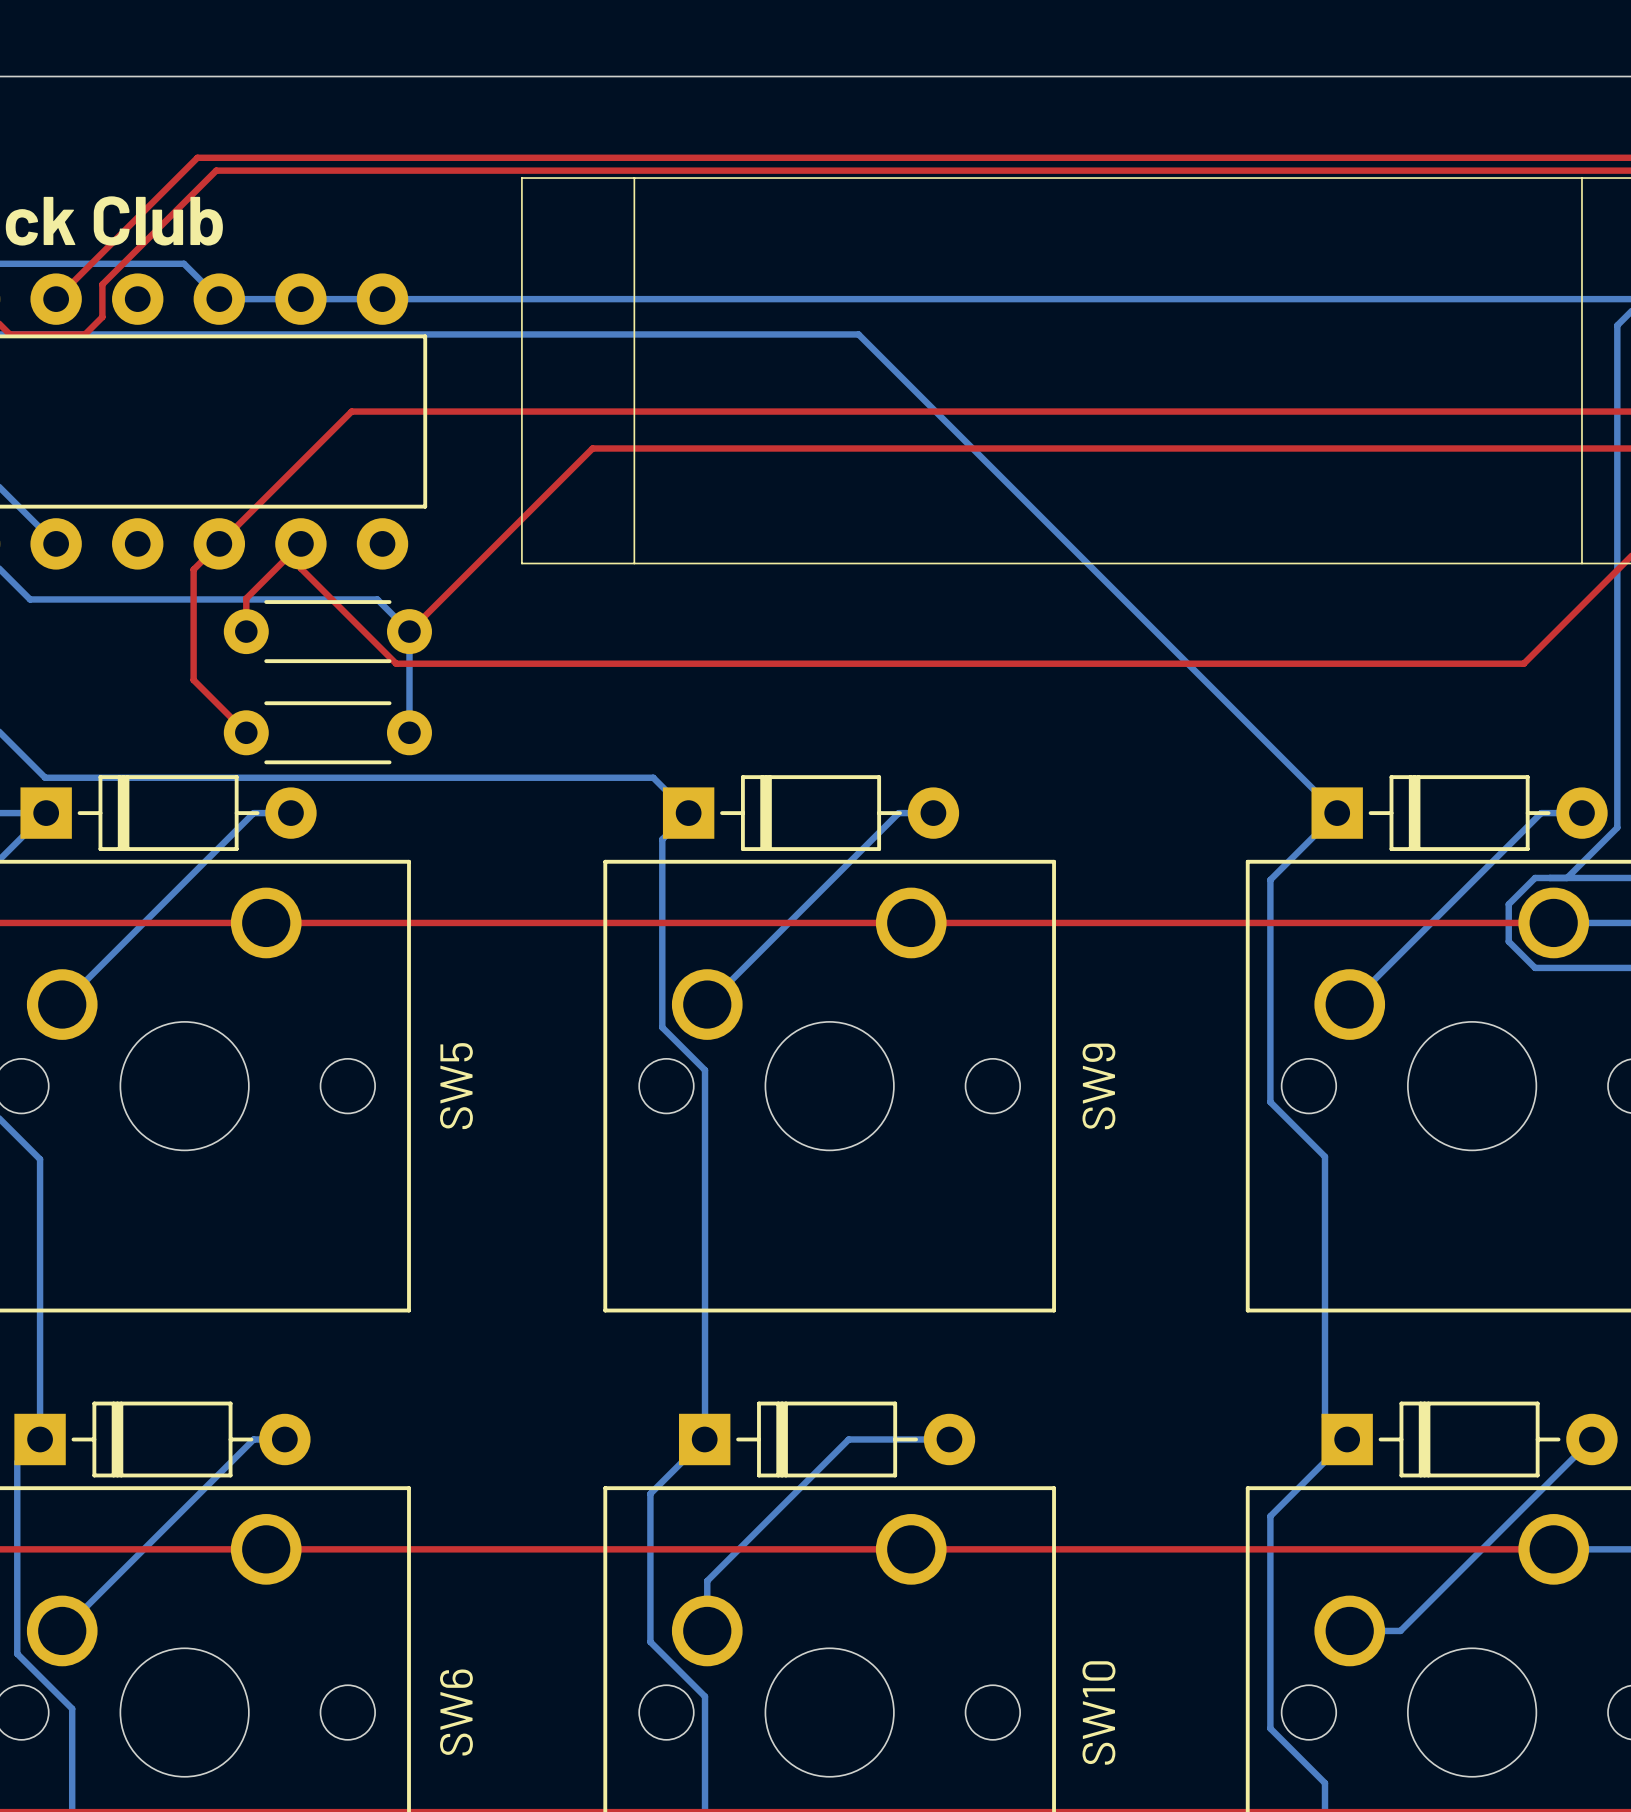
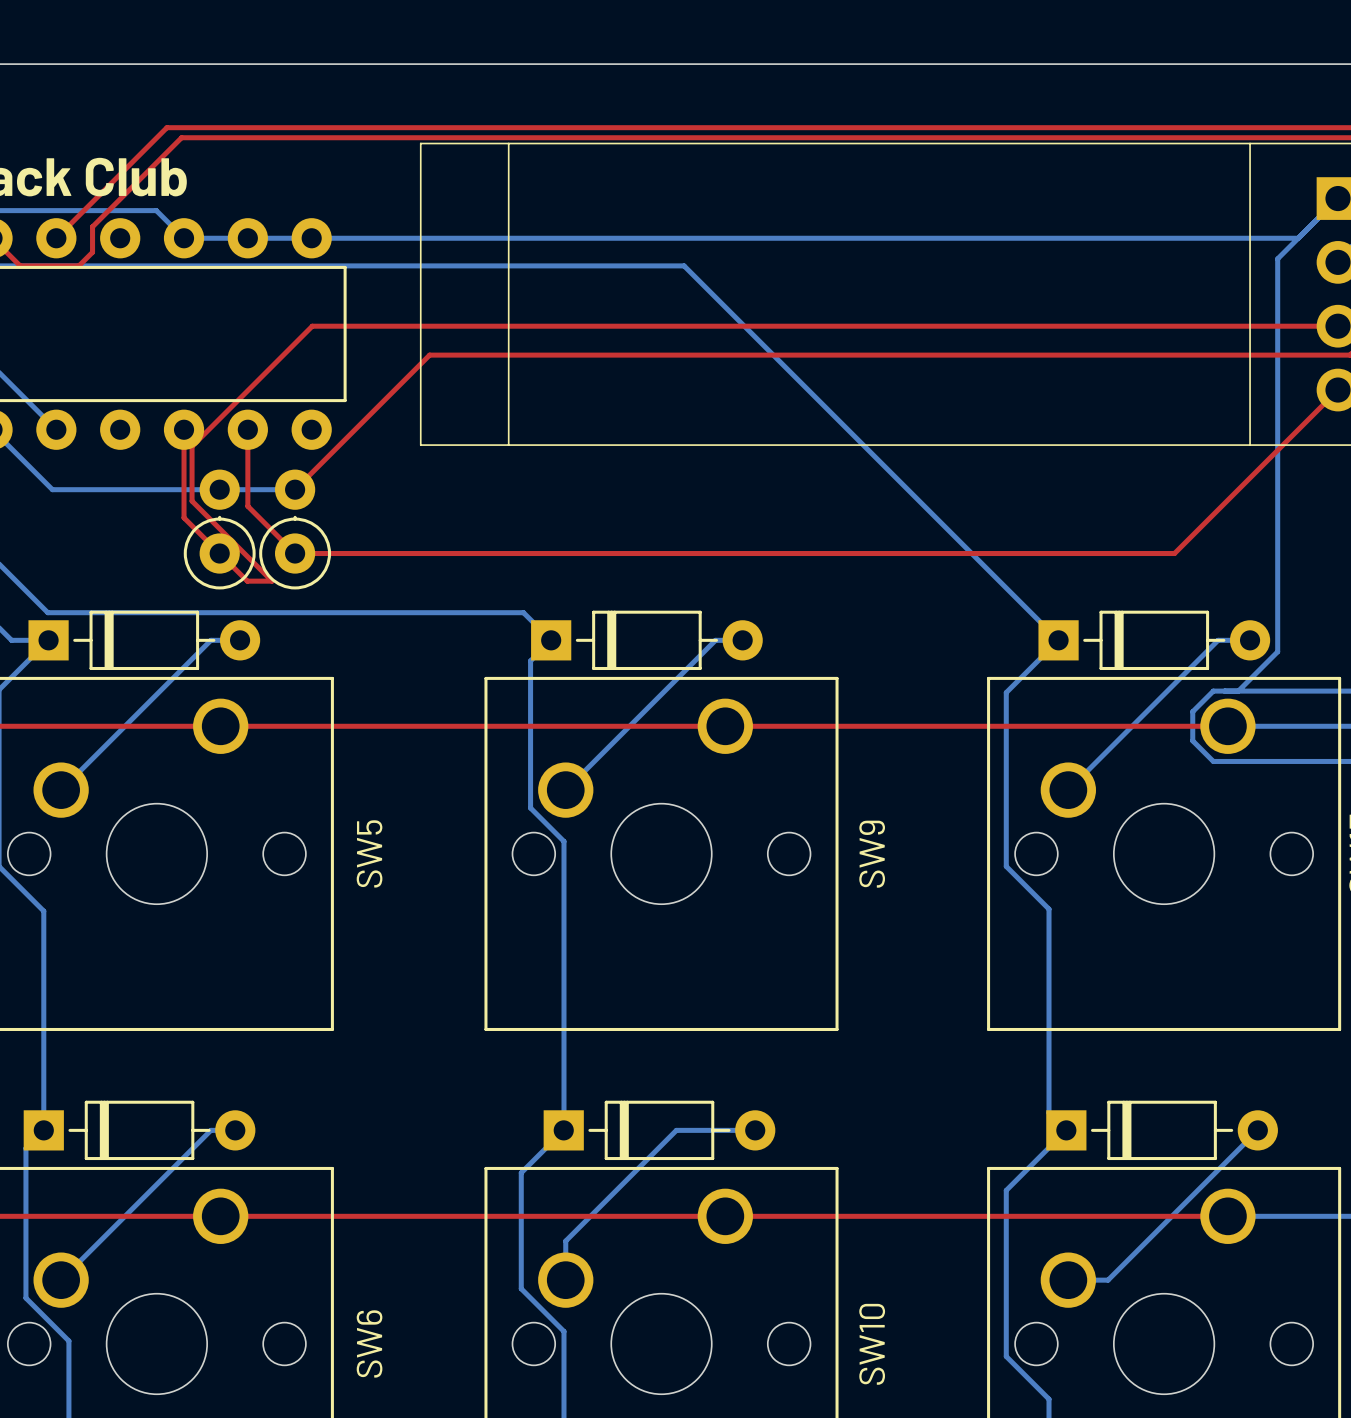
top track: (383, 411) (351, 411) (193, 569) (193, 680) (246, 732) -> (312, 326) (192, 446) (192, 501) (272, 581) (247, 581) (184, 517) (184, 429)
top track: (592, 448) (409, 631) -> (476, 355) (429, 355) (295, 489)
top track: (300, 543) (246, 598) (246, 631) -> none
top track: (300, 568) (396, 663) (1523, 663) -> (247, 448) (247, 506) (295, 553) (1174, 553) (1204, 523)
bottom track: (30, 599) (377, 599) (409, 631) (409, 732) -> (36, 473) (52, 489) (295, 489)
part: (327, 631) -> none
part: none -> (219, 529)
part: none -> (295, 529)
part: (327, 732) -> none

